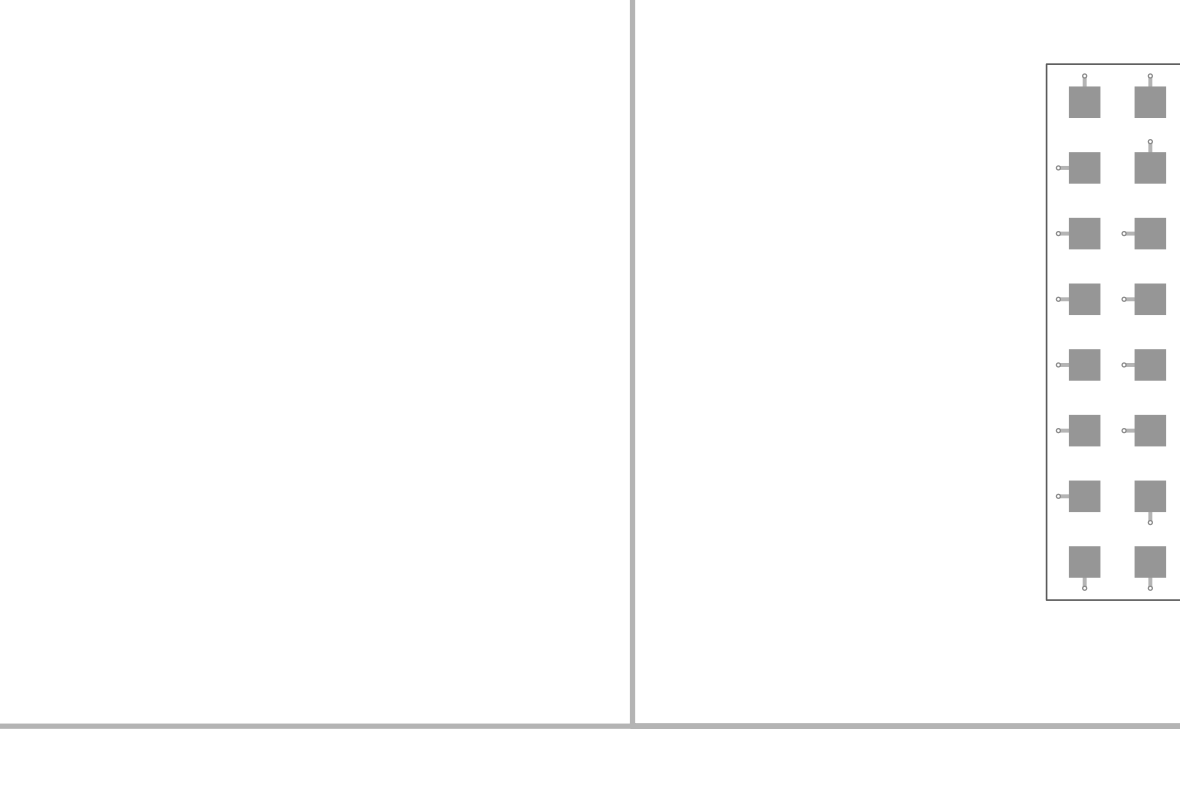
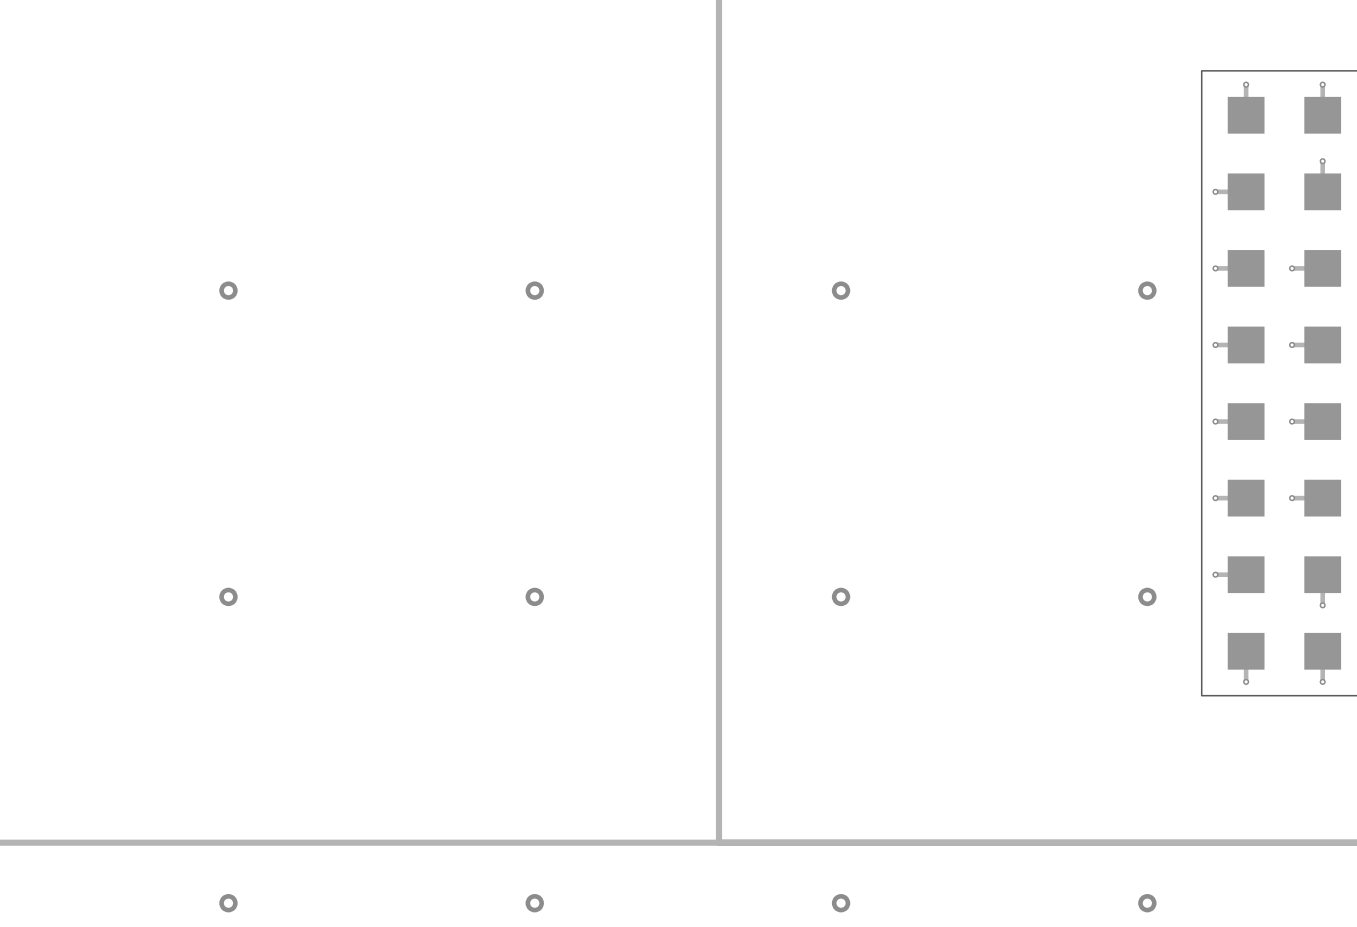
via: none -> (228, 290)
via: none -> (534, 290)
via: none -> (841, 290)
via: none -> (1147, 290)
via: none -> (228, 596)
via: none -> (534, 596)
via: none -> (841, 596)
via: none -> (1147, 596)
via: none -> (228, 903)
via: none -> (534, 903)
via: none -> (841, 903)
via: none -> (1147, 903)

